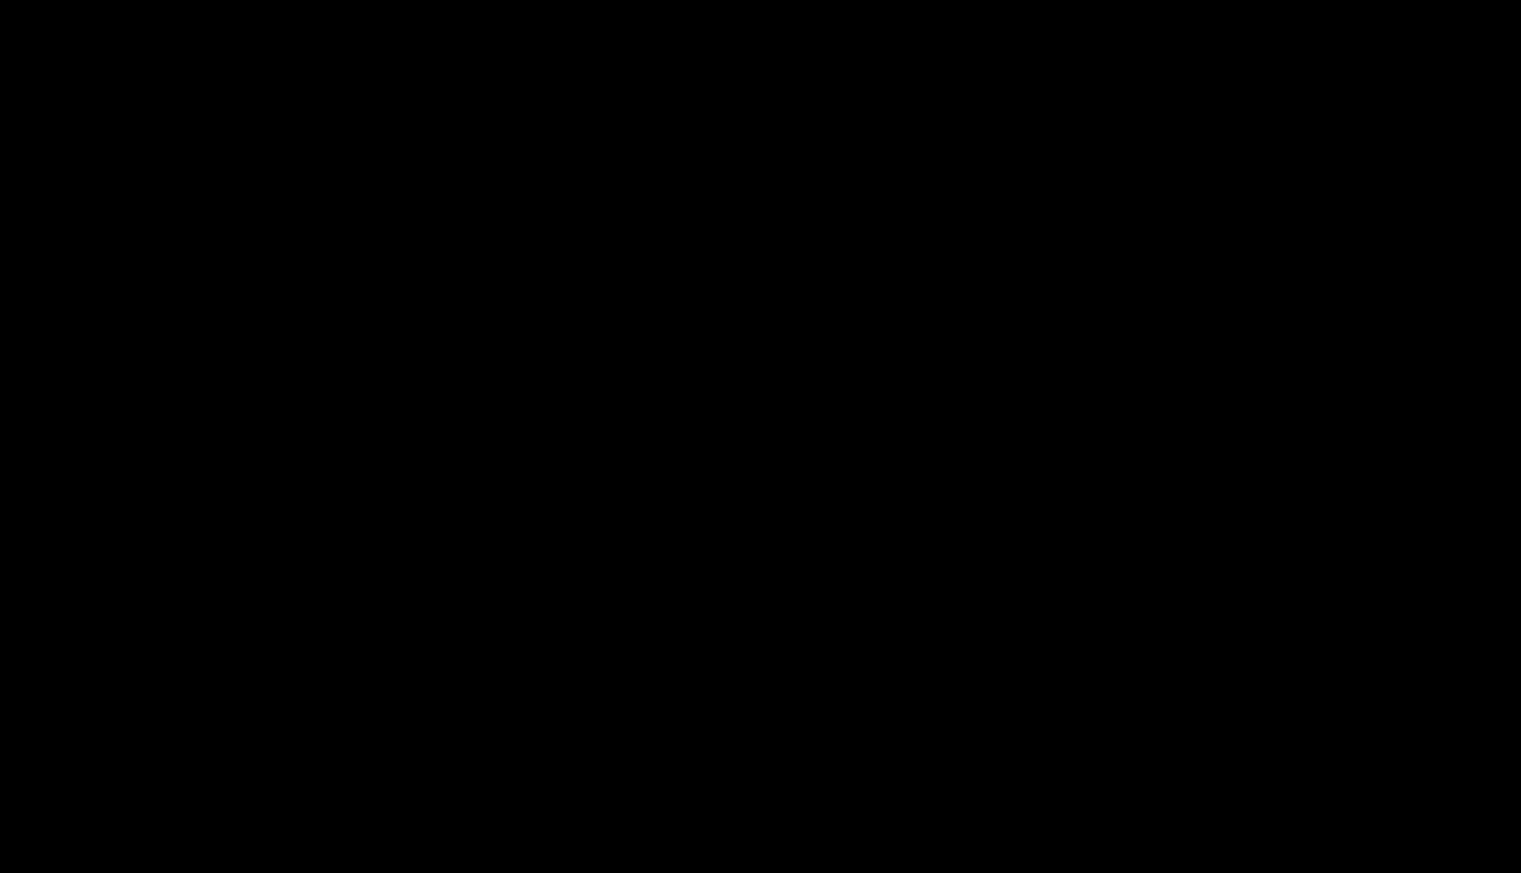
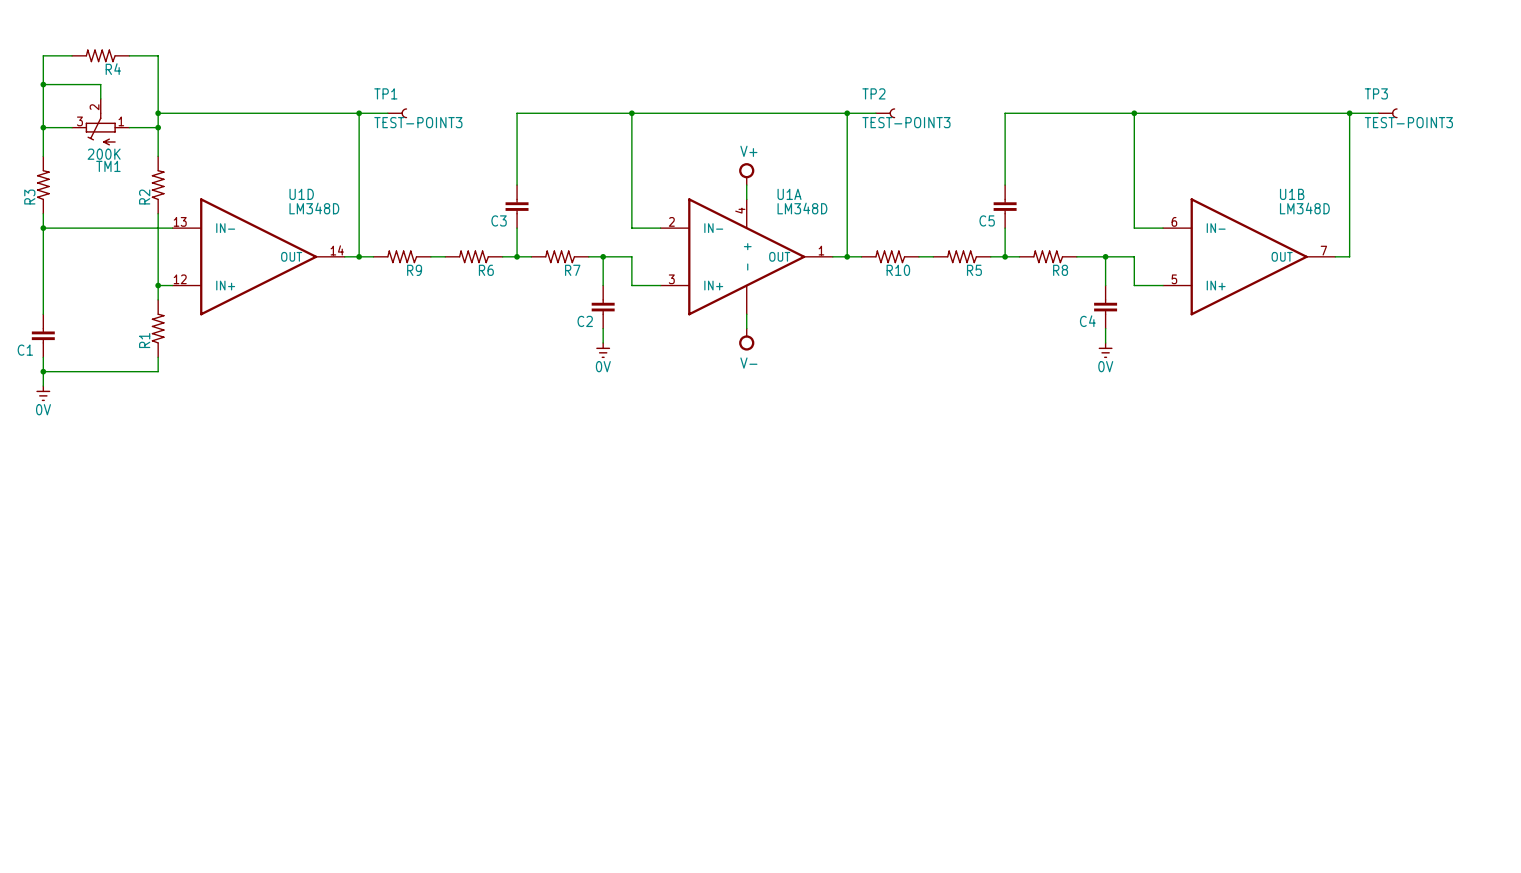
wire: none -> (72, 55) (43, 55) (43, 156)
R4: none -> (100, 55)
wire: none -> (129, 55) (158, 55) (158, 156)
wire: none -> (43, 84) (100, 84) (100, 98)
junction: none -> (43, 84)
wire: none -> (158, 113) (387, 113)
junction: none -> (158, 113)
wire: none -> (359, 113) (359, 256)
junction: none -> (359, 113)
TP1: none -> TEST-POINT3 (397, 113)
wire: none -> (631, 113) (631, 228) (660, 228)
junction: none -> (631, 113)
wire: none -> (847, 113) (847, 256)
junction: none -> (847, 113)
wire: none -> (875, 113) (517, 113) (517, 185)
TP2: none -> TEST-POINT3 (885, 113)
wire: none -> (1134, 113) (1134, 228) (1163, 228)
junction: none -> (1134, 113)
wire: none -> (1349, 113) (1349, 256) (1335, 256)
junction: none -> (1349, 113)
wire: none -> (1378, 113) (1005, 113) (1005, 185)
TP3: none -> TEST-POINT3 (1387, 113)
TM1: none -> 200K (100, 122)
wire: none -> (43, 127) (72, 127)
junction: none -> (43, 127)
wire: none -> (129, 127) (158, 127)
junction: none -> (158, 127)
power symbol: none -> V+ (746, 174)
R3: none -> (43, 185)
R2: none -> (158, 185)
wire: none -> (746, 185) (746, 199)
C3: none -> (517, 206)
C5: none -> (1005, 206)
wire: none -> (43, 213) (43, 314)
wire: none -> (158, 213) (158, 299)
wire: none -> (43, 228) (172, 228)
junction: none -> (43, 228)
wire: none -> (517, 228) (517, 256)
wire: none -> (1005, 228) (1005, 256)
U1D: none -> LM348D (258, 256)
wire: none -> (344, 256) (373, 256)
junction: none -> (359, 256)
R9: none -> (402, 256)
wire: none -> (430, 256) (445, 256)
R6: none -> (473, 256)
wire: none -> (502, 256) (531, 256)
junction: none -> (517, 256)
R7: none -> (560, 256)
wire: none -> (588, 256) (631, 256) (631, 285) (660, 285)
wire: none -> (603, 256) (603, 285)
junction: none -> (603, 256)
U1A: none -> LM348D (746, 256)
wire: none -> (832, 256) (861, 256)
junction: none -> (847, 256)
R10: none -> (890, 256)
wire: none -> (918, 256) (933, 256)
R5: none -> (962, 256)
wire: none -> (990, 256) (1019, 256)
junction: none -> (1005, 256)
R8: none -> (1048, 256)
wire: none -> (1076, 256) (1134, 256) (1134, 285) (1163, 285)
wire: none -> (1105, 256) (1105, 285)
junction: none -> (1105, 256)
U1B: none -> LM348D (1249, 256)
wire: none -> (158, 285) (172, 285)
junction: none -> (158, 285)
C2: none -> (603, 307)
C4: none -> (1105, 307)
wire: none -> (746, 314) (746, 328)
R1: none -> (158, 328)
wire: none -> (603, 328) (603, 342)
wire: none -> (1105, 328) (1105, 342)
C1: none -> (43, 335)
power symbol: none -> V- (746, 339)
power symbol: none -> 0V (603, 350)
power symbol: none -> 0V (1105, 350)
wire: none -> (43, 357) (43, 386)
wire: none -> (158, 357) (158, 371) (43, 371)
junction: none -> (43, 371)
power symbol: none -> 0V (43, 393)

